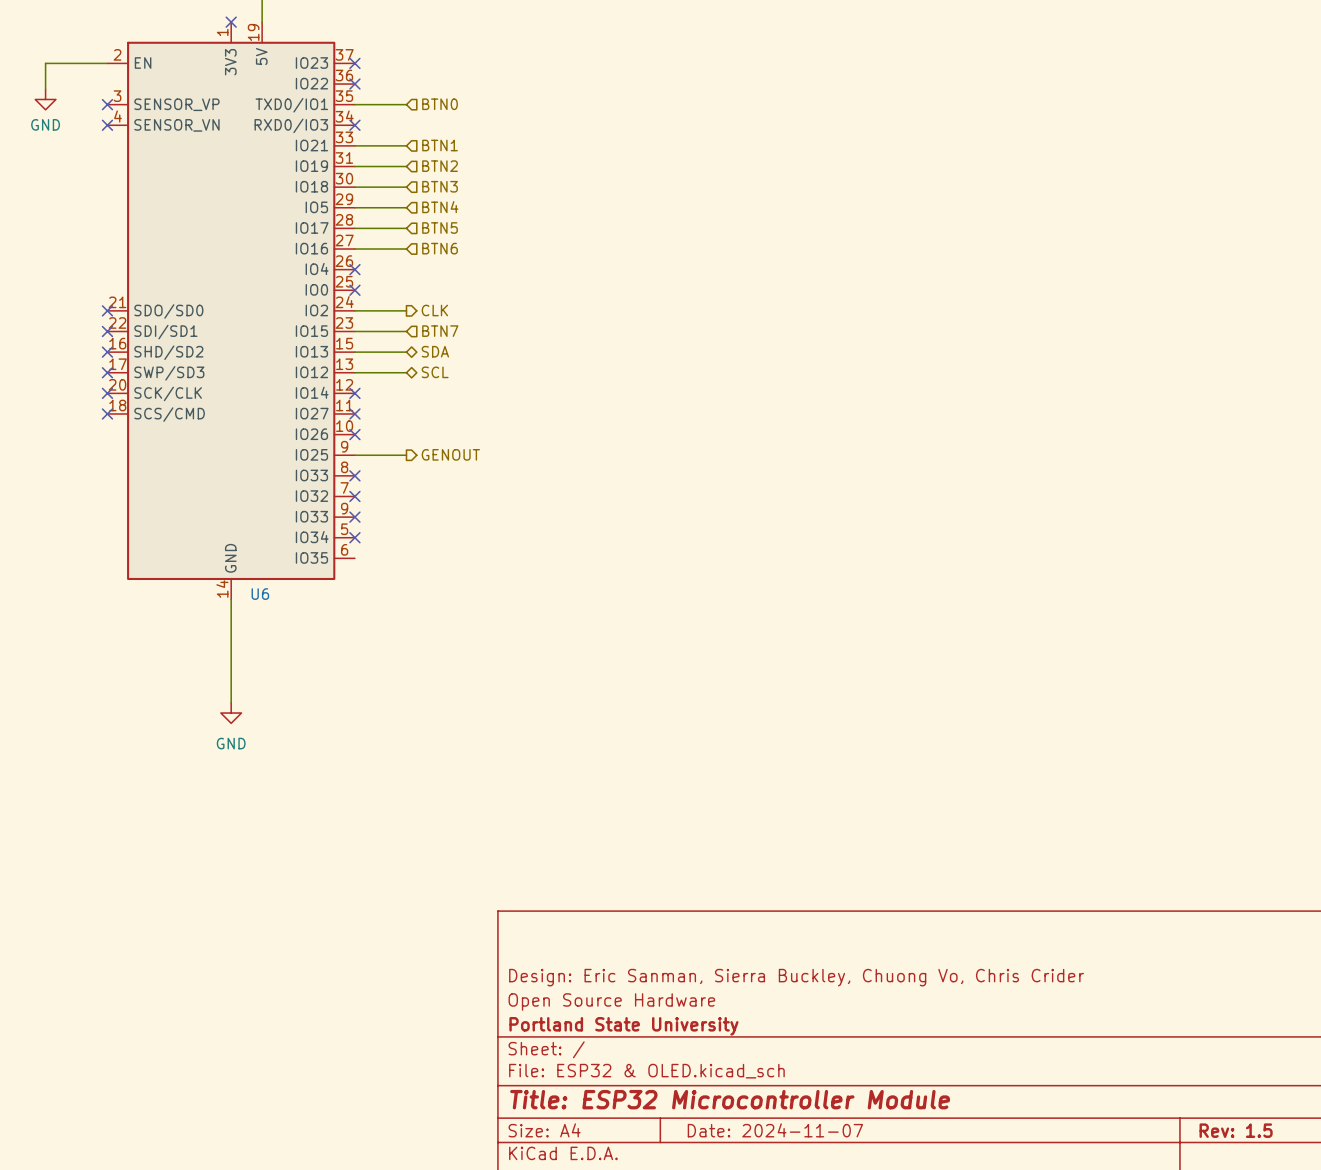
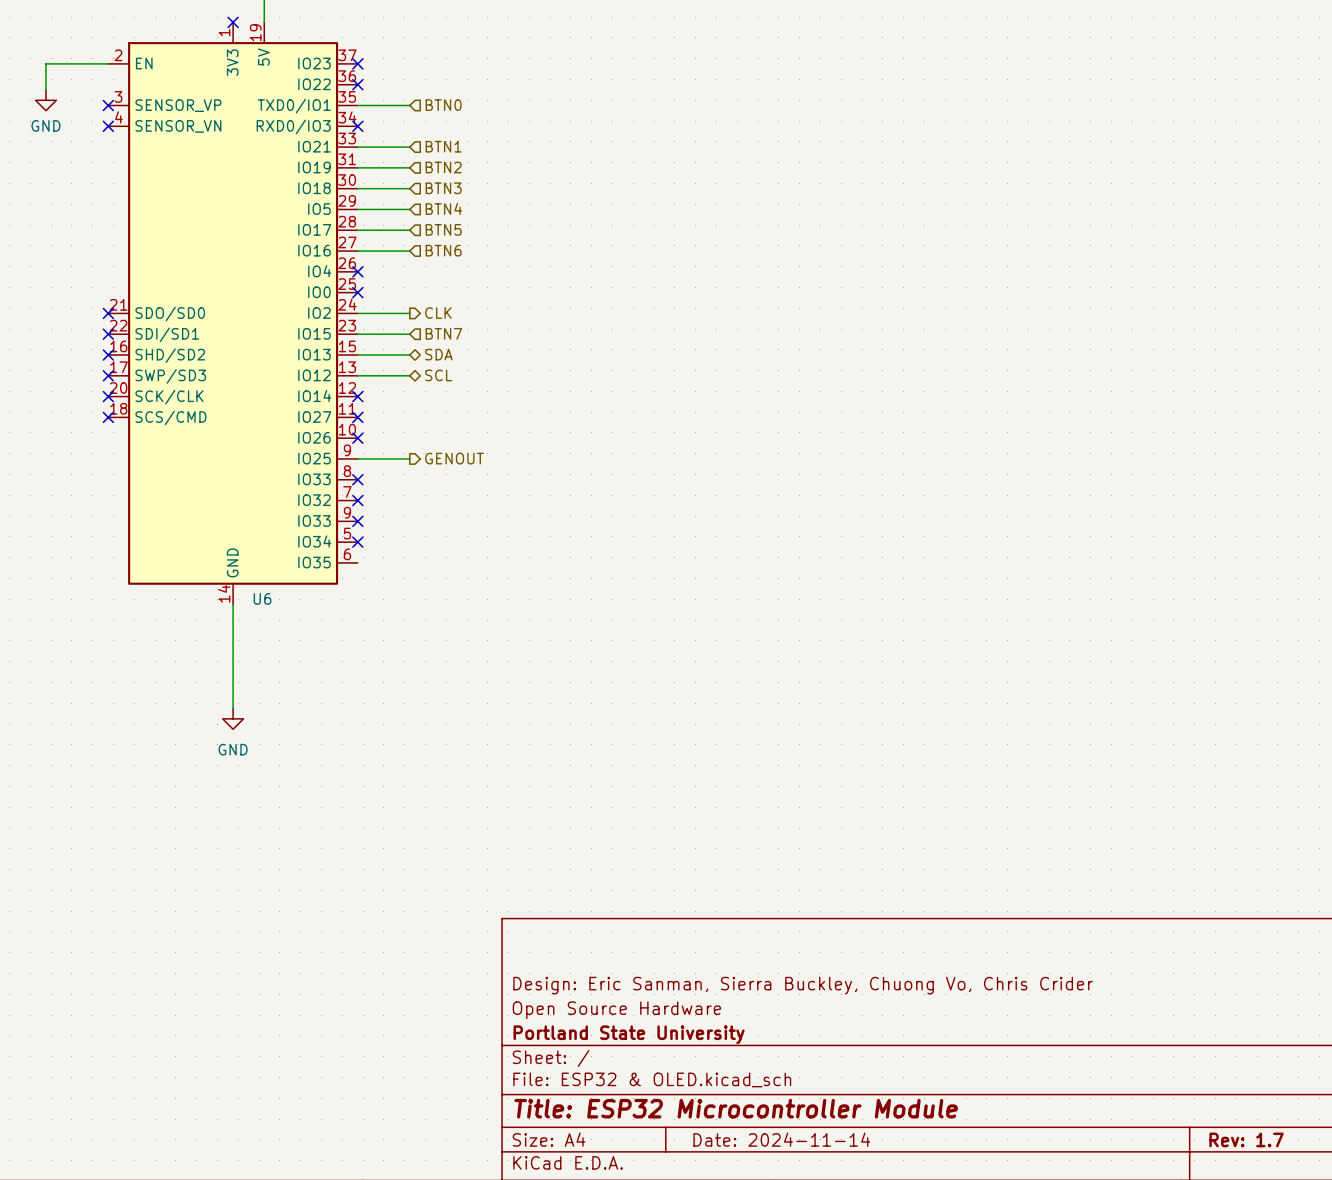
title block: Date: 2024-11-07 (775, 1130) -> Date: 2024-11-14 (781, 1139)
title block: Rev: 1.5 (1236, 1130) -> Rev: 1.7 (1246, 1139)

